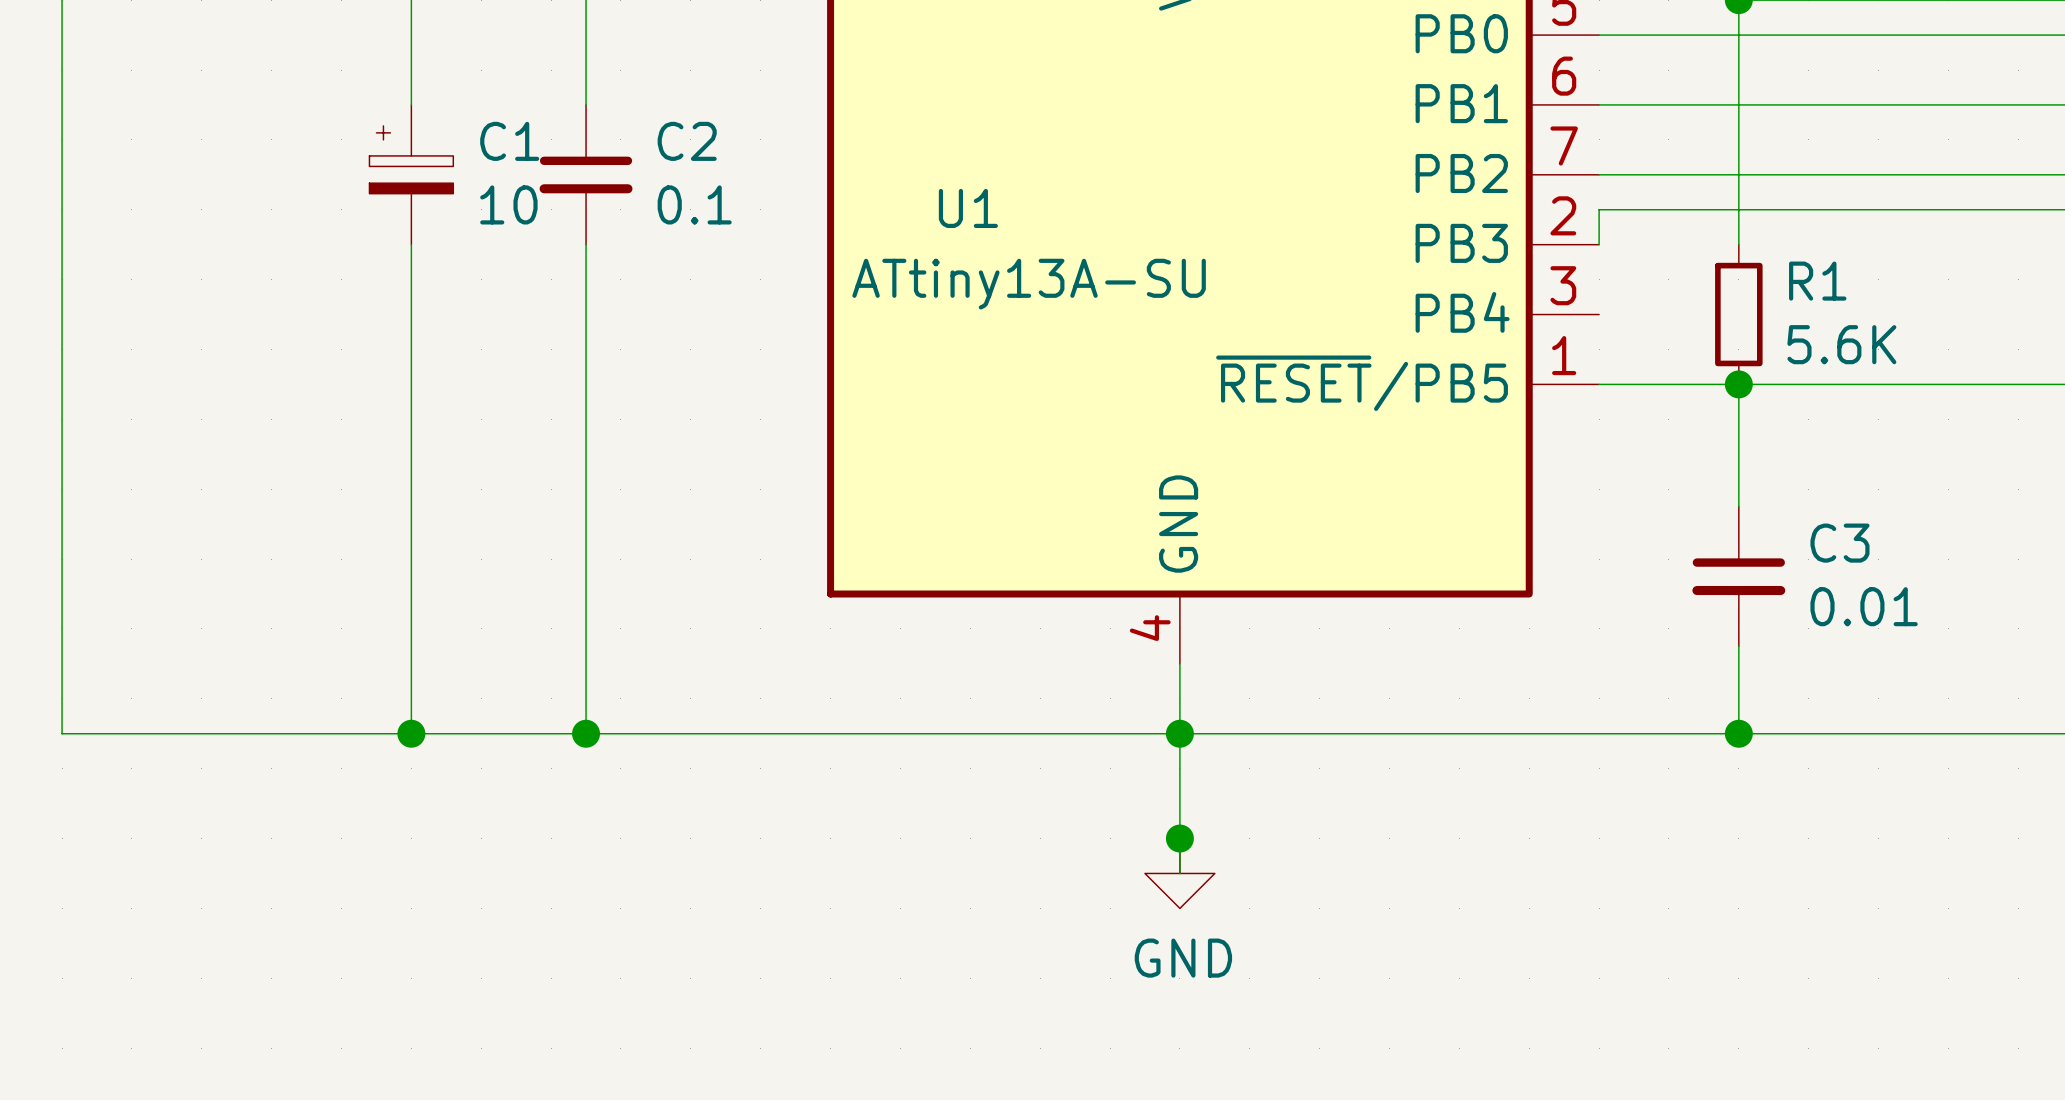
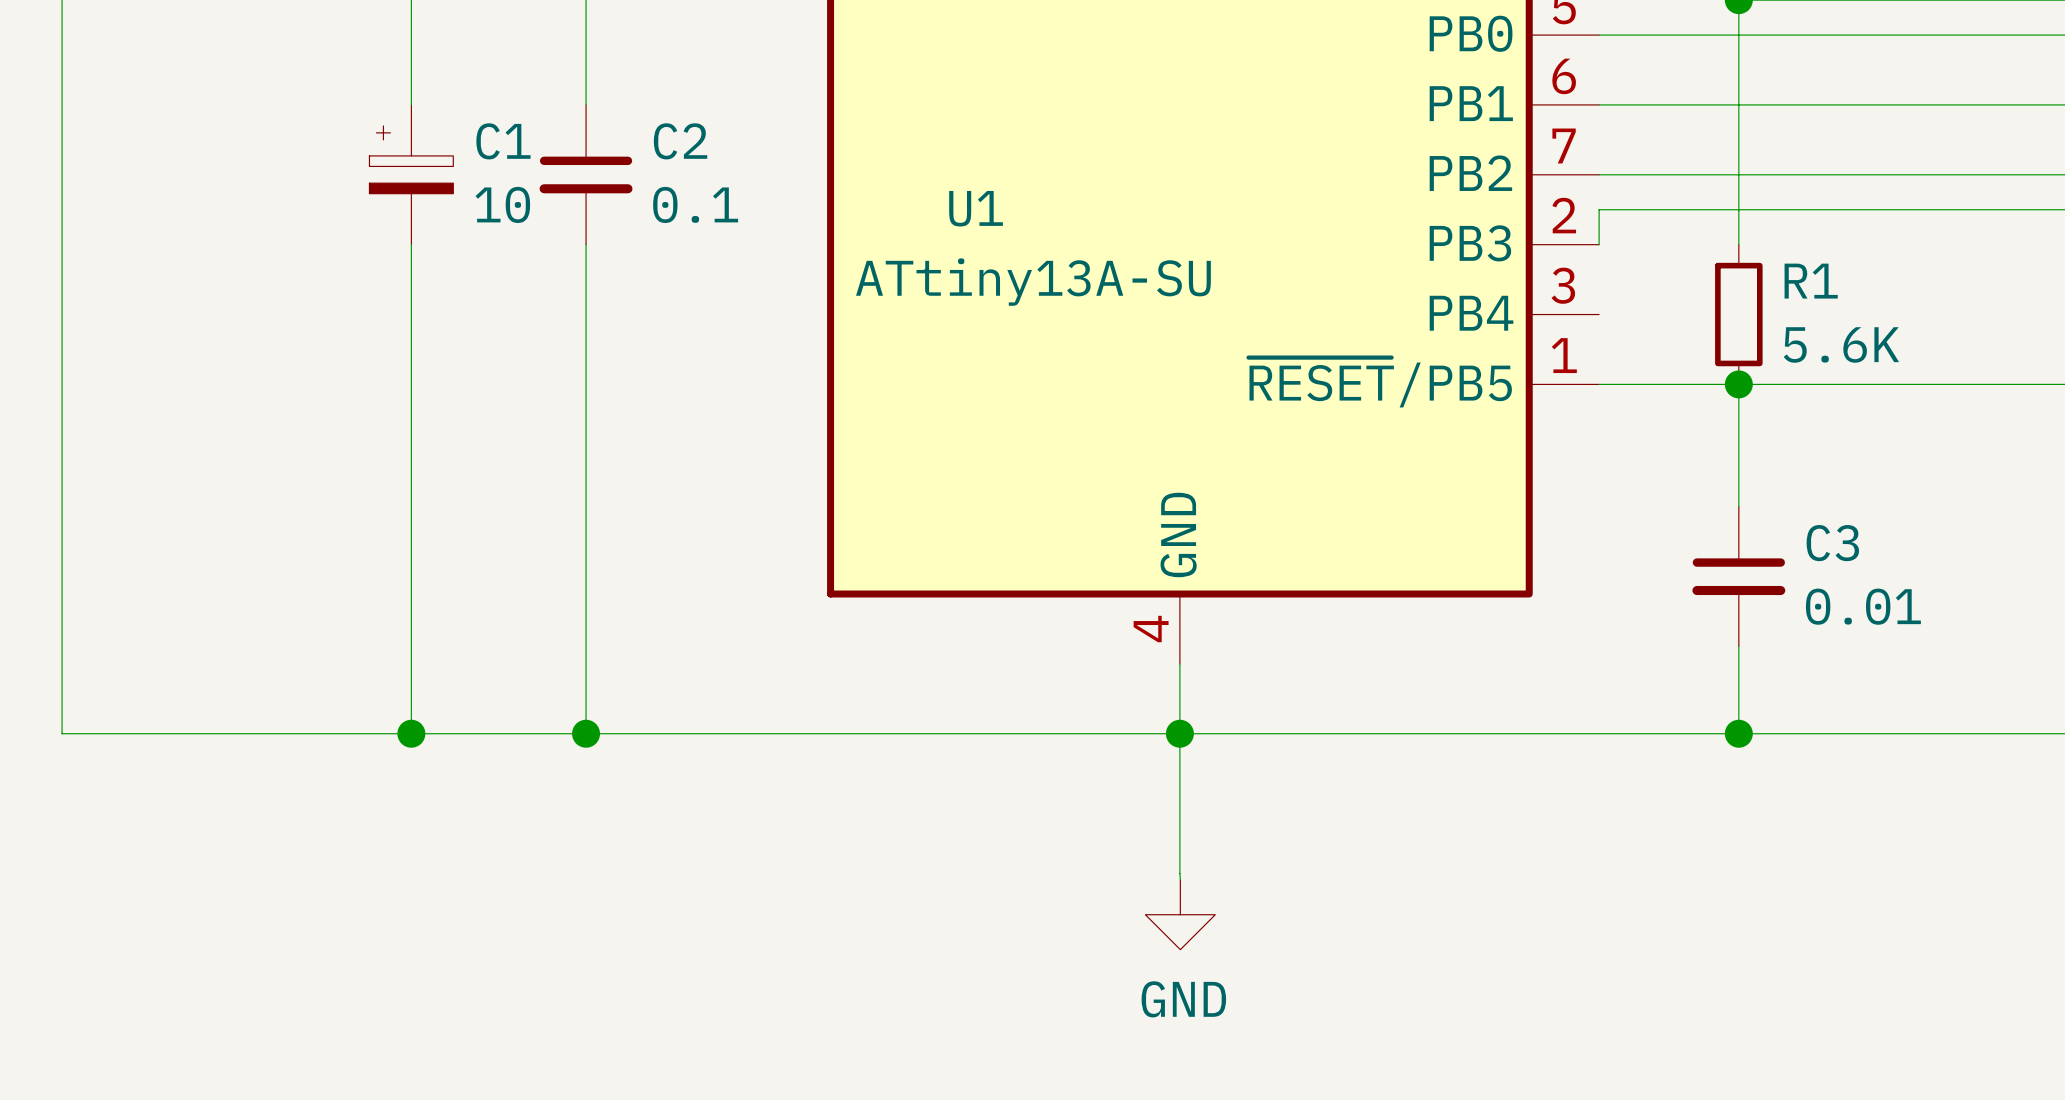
junction: (1179, 838) -> none
wire: none -> (1179, 873) (1180, 879)
power symbol position: GND (1179, 873) -> GND (1180, 914)

